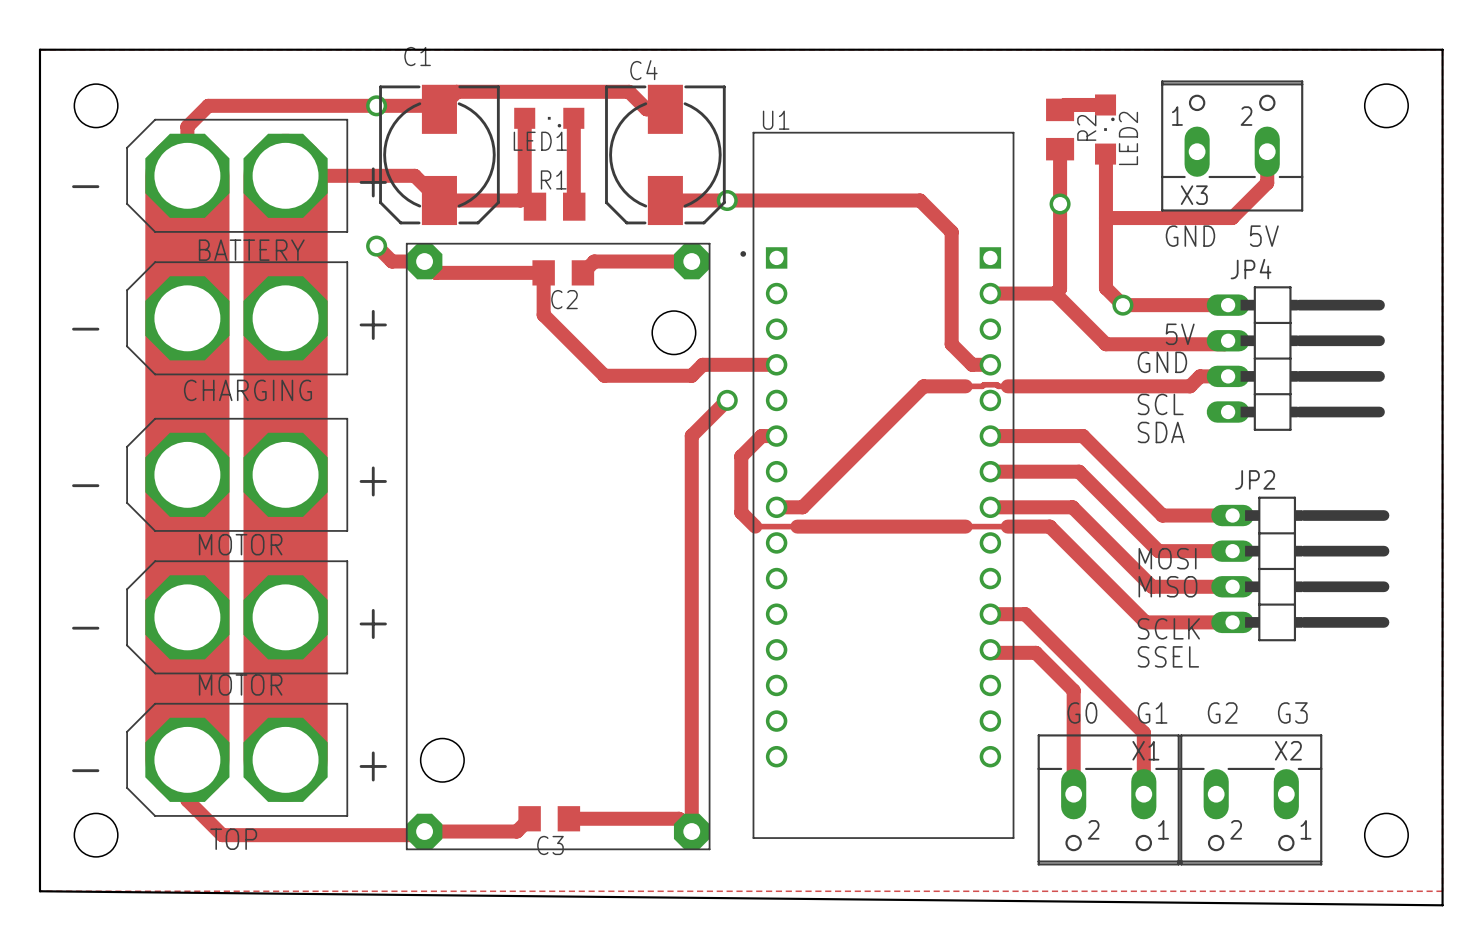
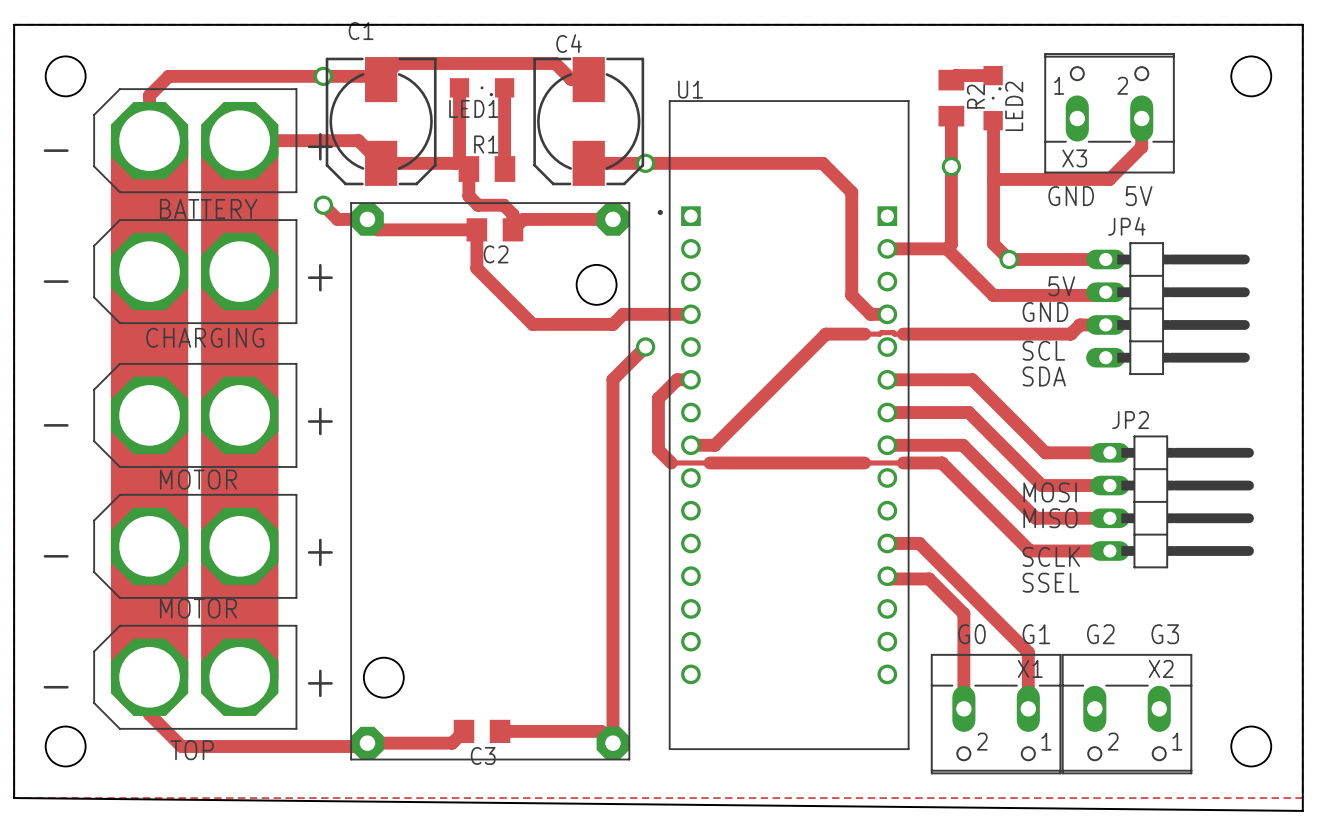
track: none -> (468, 169) (468, 196) (478, 205) (503, 205) (512, 214) (512, 229)

